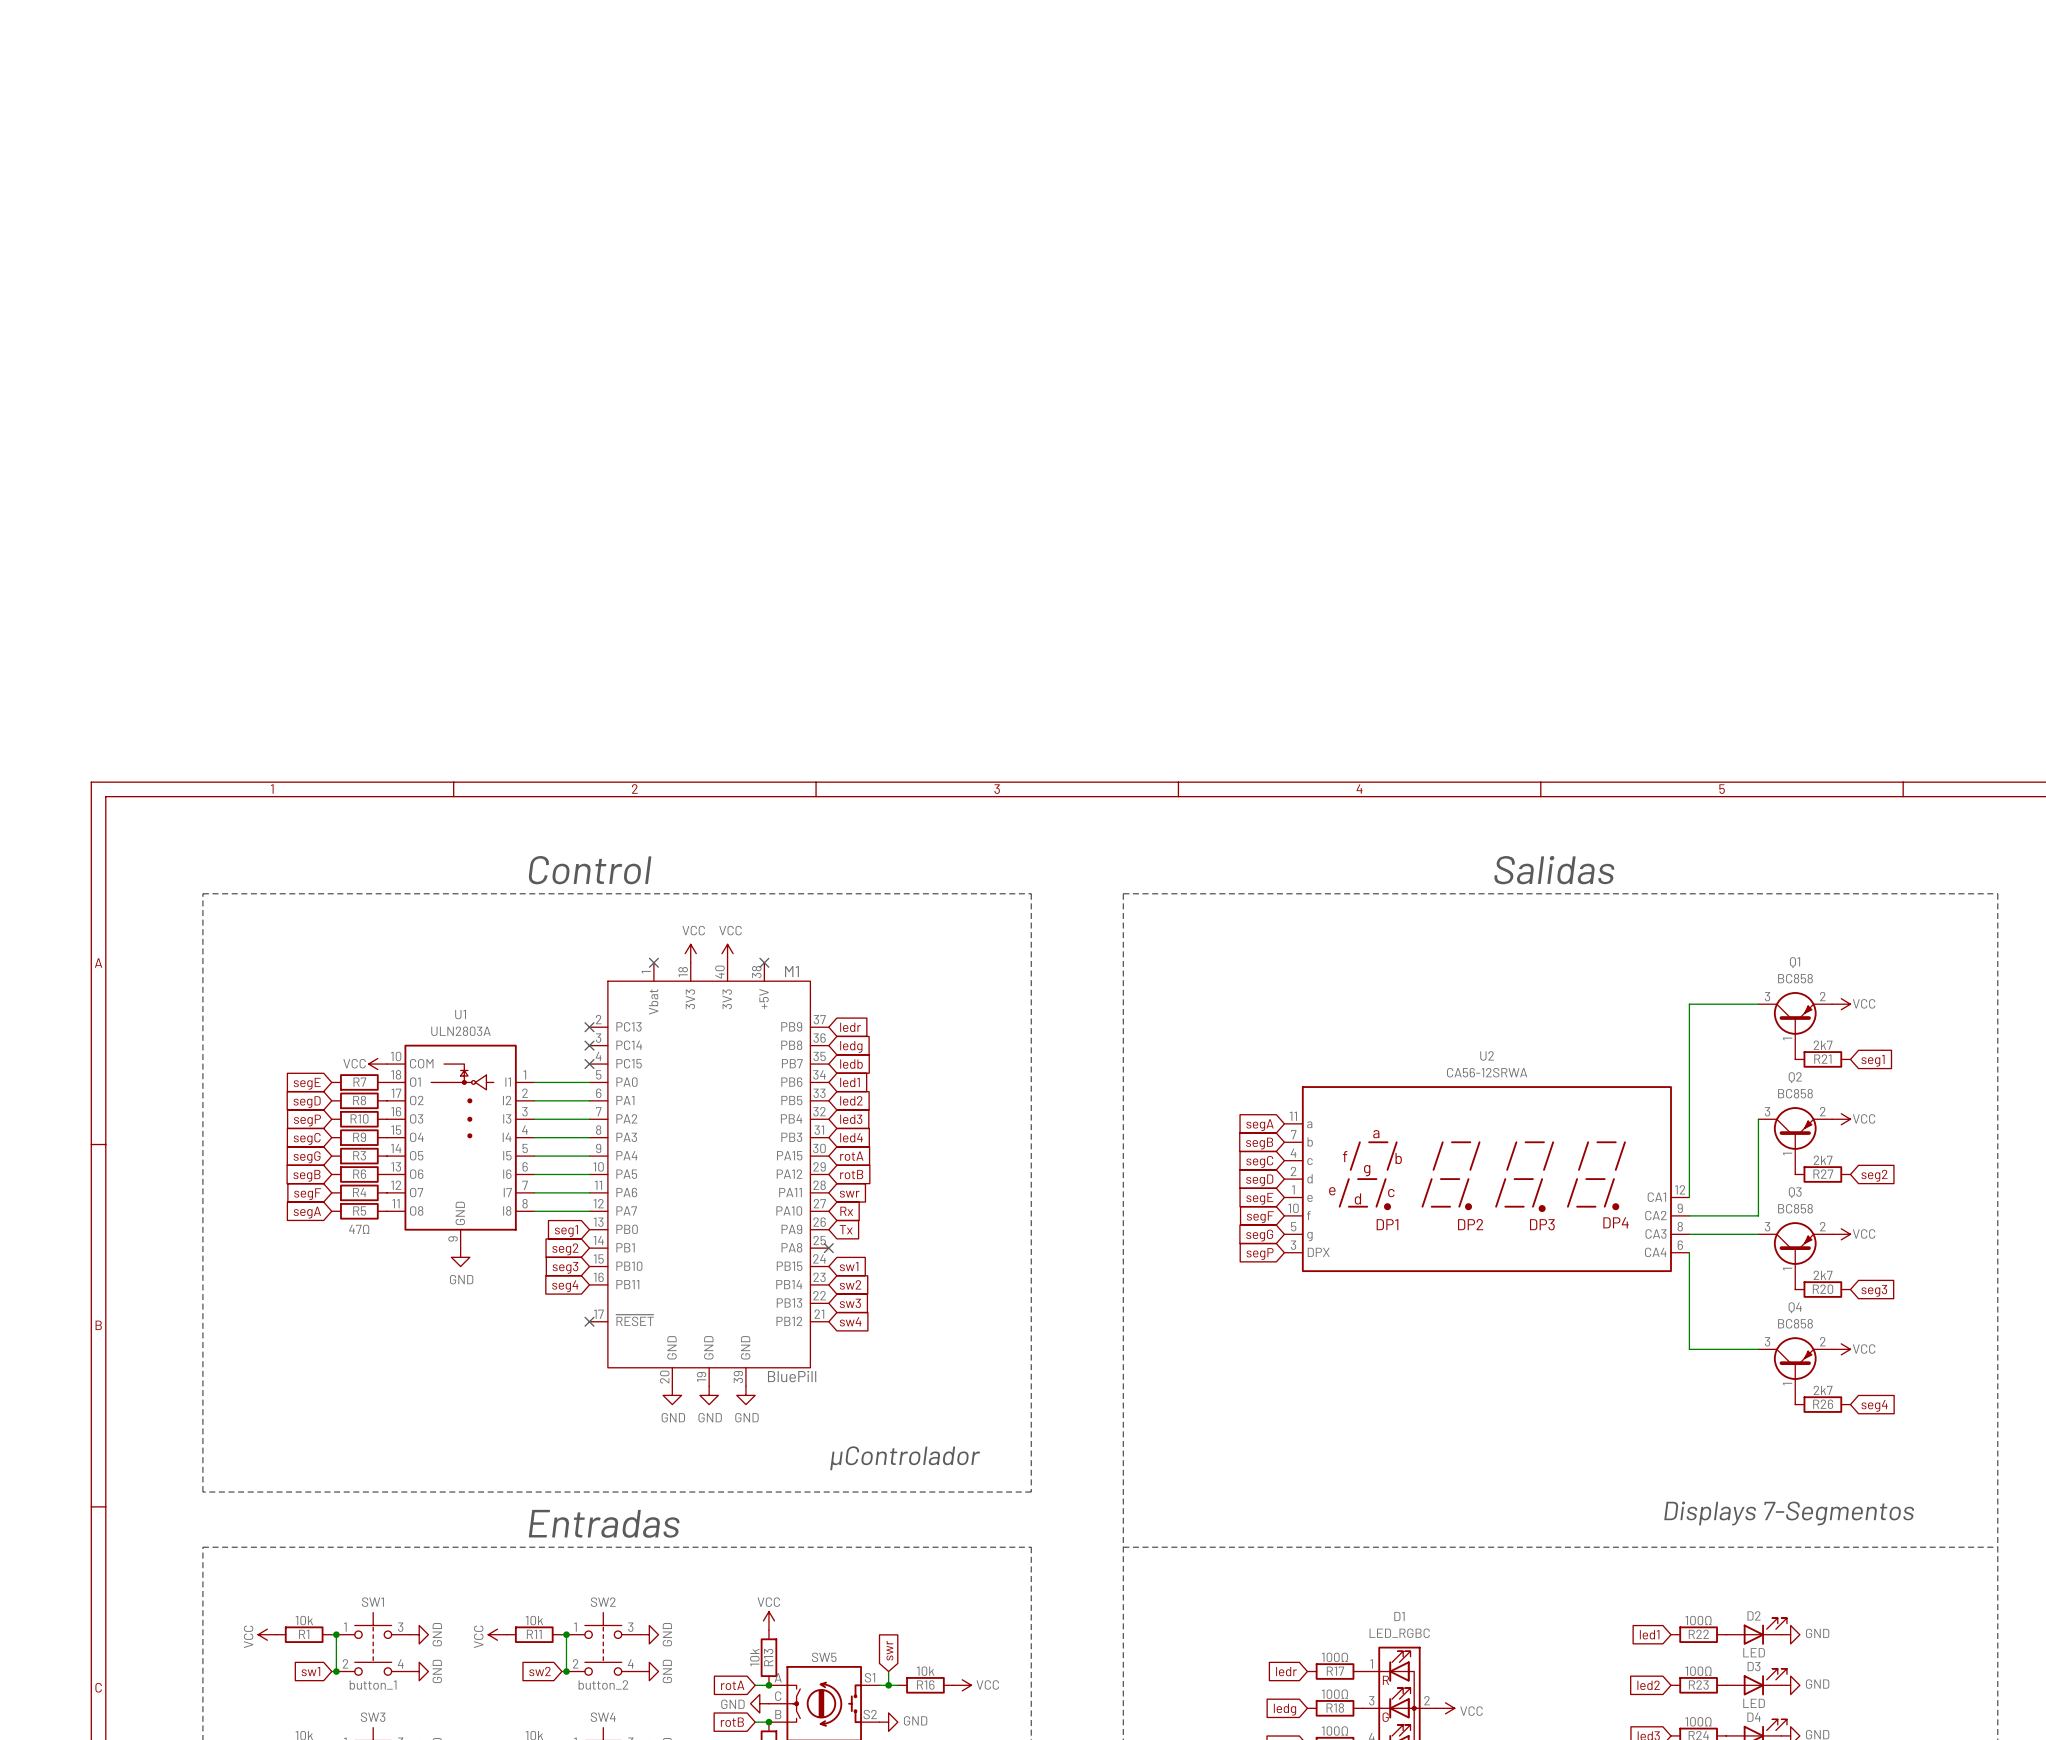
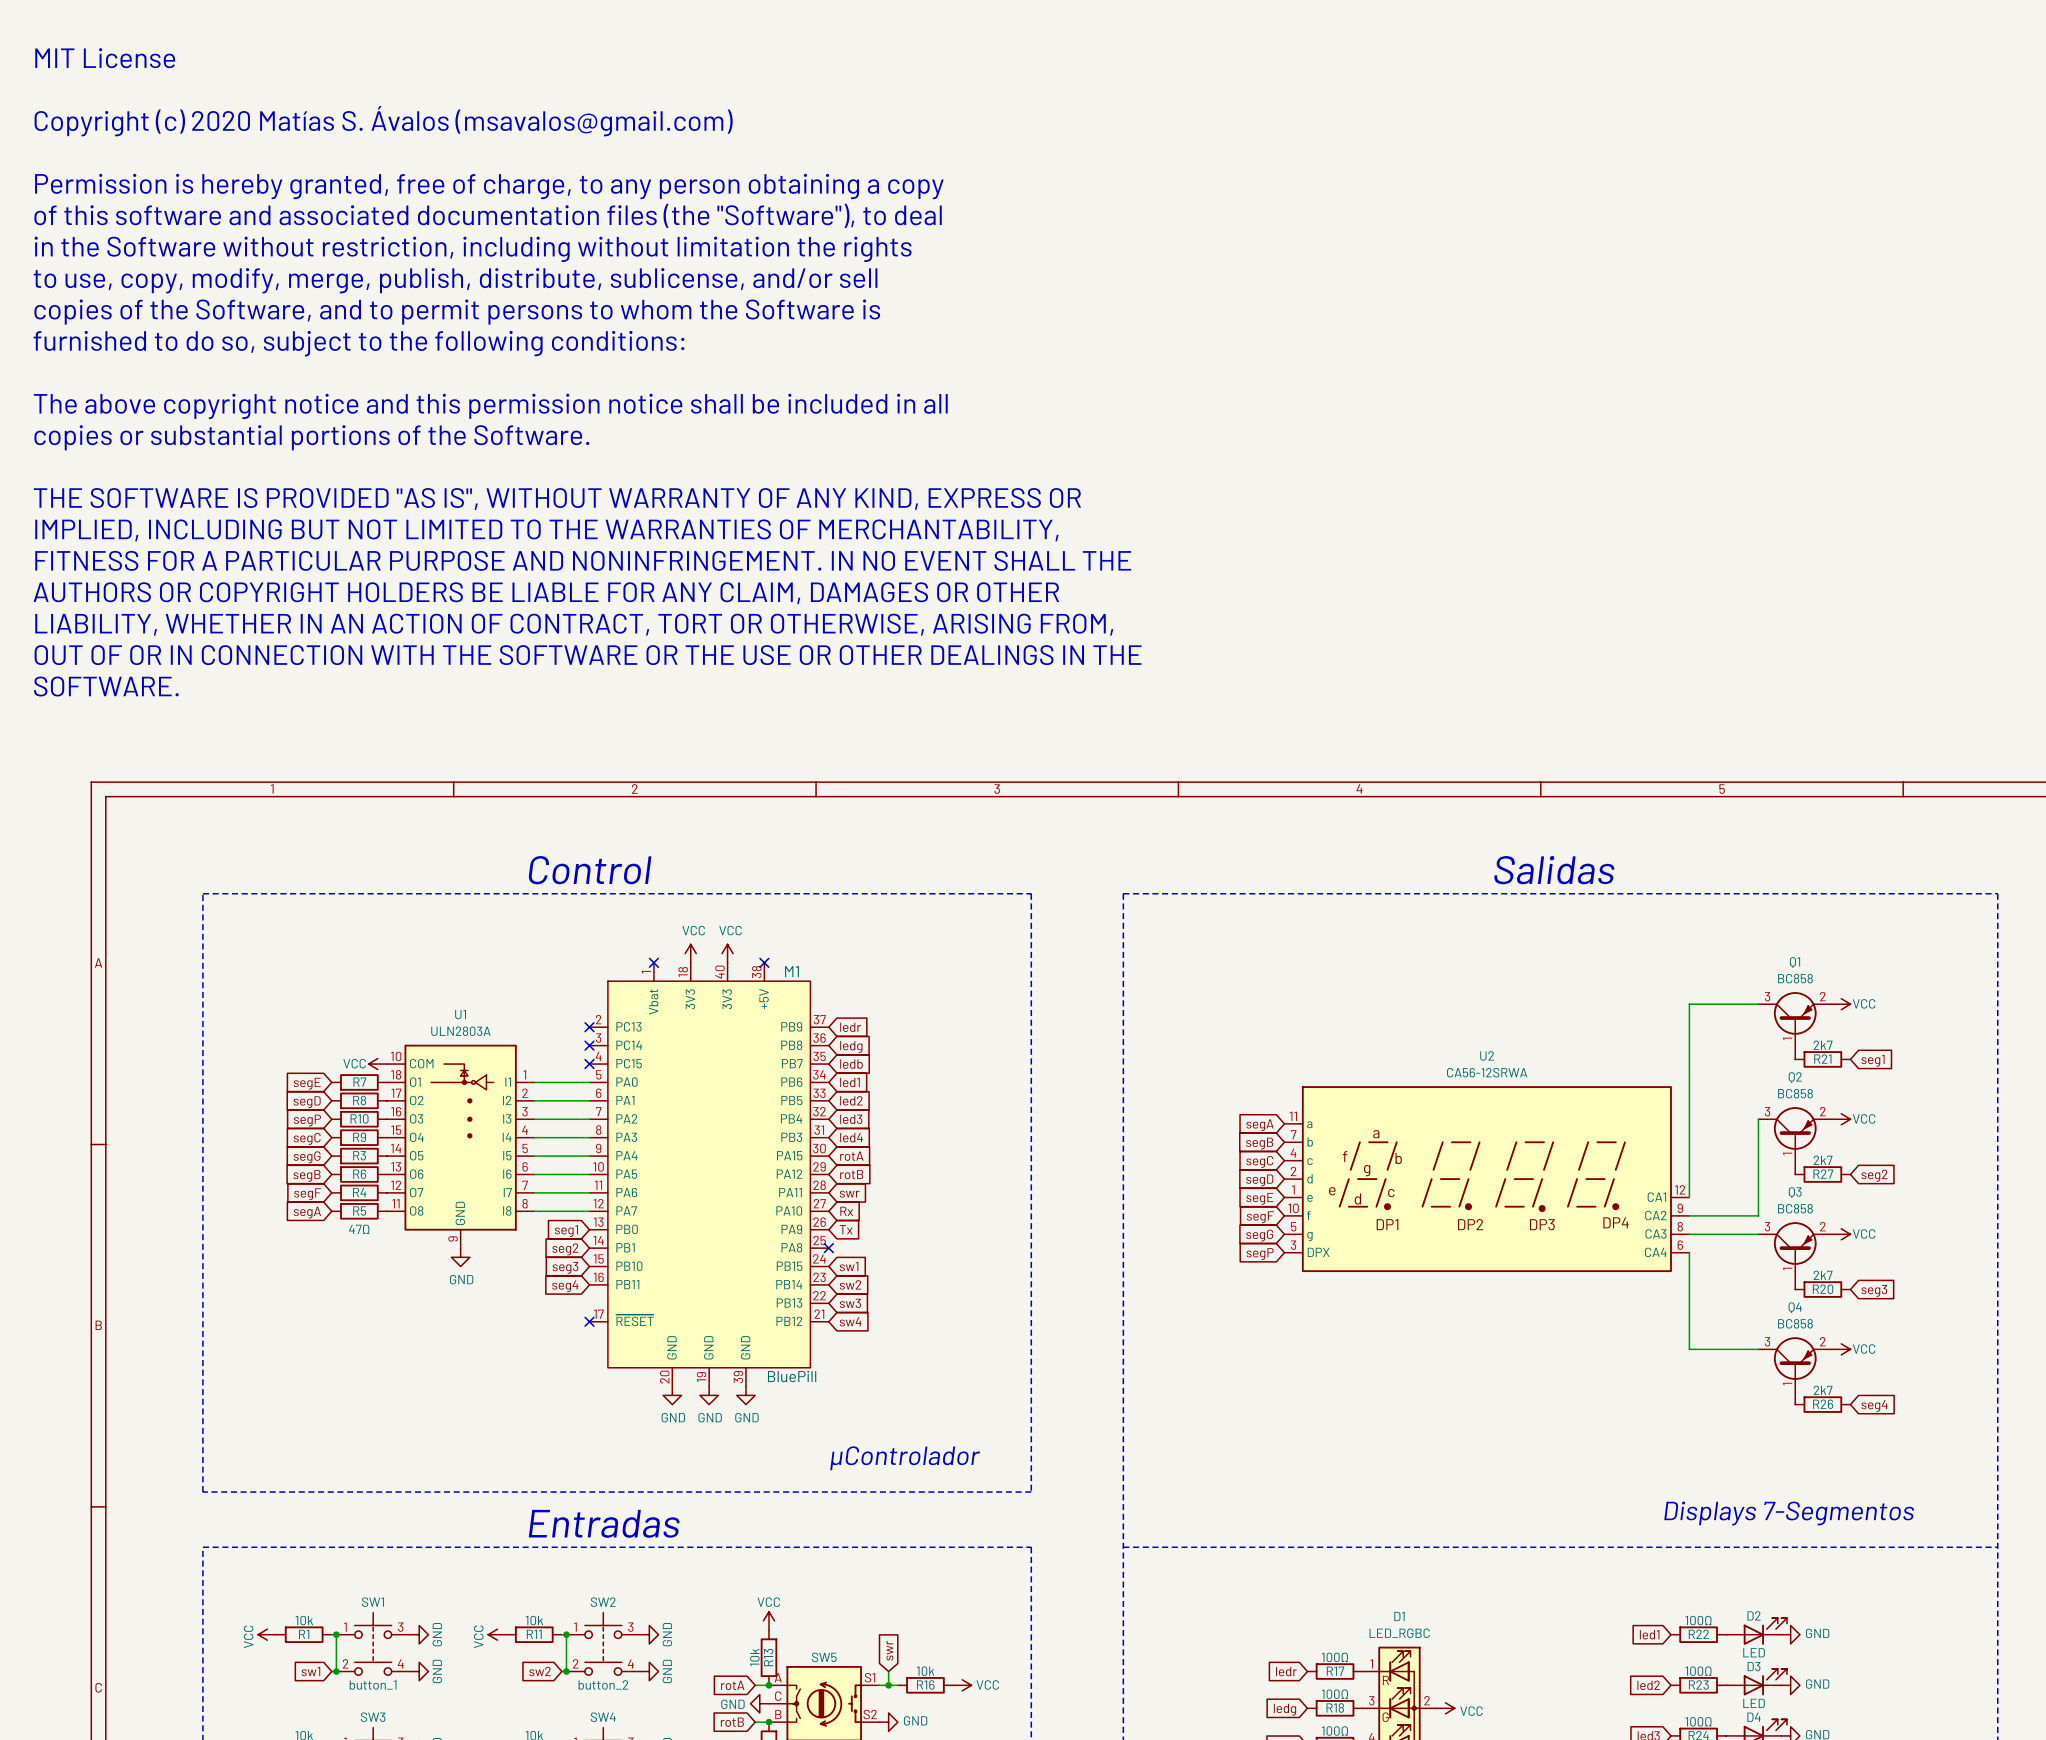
text: none -> MIT License (105, 58)
text: none -> Copyright (c) 2020 Matías S. Ávalos (msavalos@gmail.com) (383, 121)
text: none -> Permission is hereby granted, free of charge, to any person obtaining a copy (489, 186)
text: none -> of this software and associated documentation files (the "Software"), to deal (488, 215)
text: none -> in the Software without restriction, including without limitation the rights (473, 249)
text: none -> to use, copy, modify, merge, publish, distribute, sublicense, and/or sell (455, 280)
text: none -> copies of the Software, and to permit persons to whom the Software is (457, 312)
text: none -> furnished to do so, subject to the following conditions: (358, 343)
text: none -> The above copyright notice and this permission notice shall be included in all (490, 406)
text: none -> copies or substantial portions of the Software. (311, 437)
text: none -> THE SOFTWARE IS PROVIDED "AS IS", WITHOUT WARRANTY OF ANY KIND, EXPRESS OR (557, 499)
text: none -> IMPLIED, INCLUDING BUT NOT LIMITED TO THE WARRANTIES OF MERCHANTABILITY, (546, 530)
text: none -> FITNESS FOR A PARTICULAR PURPOSE AND NONINFRINGEMENT. IN NO EVENT SHALL THE (583, 560)
text: none -> AUTHORS OR COPYRIGHT HOLDERS BE LIABLE FOR ANY CLAIM, DAMAGES OR OTHER (546, 593)
text: none -> LIABILITY, WHETHER IN AN ACTION OF CONTRACT, TORT OR OTHERWISE, ARISING FROM, (574, 624)
text: none -> OUT OF OR IN CONNECTION WITH THE SOFTWARE OR THE USE OR OTHER DEALINGS IN THE (588, 655)
text: none -> SOFTWARE. (106, 686)

